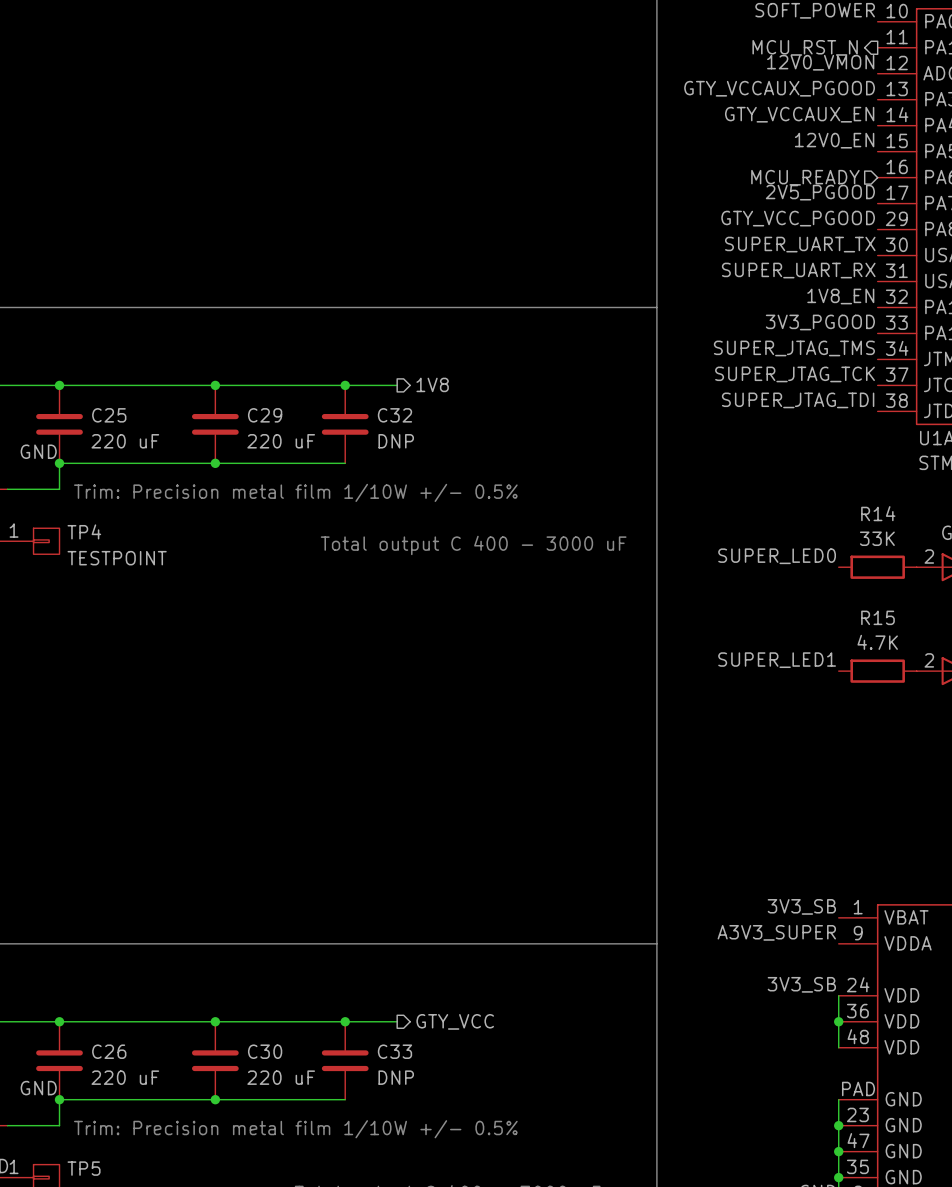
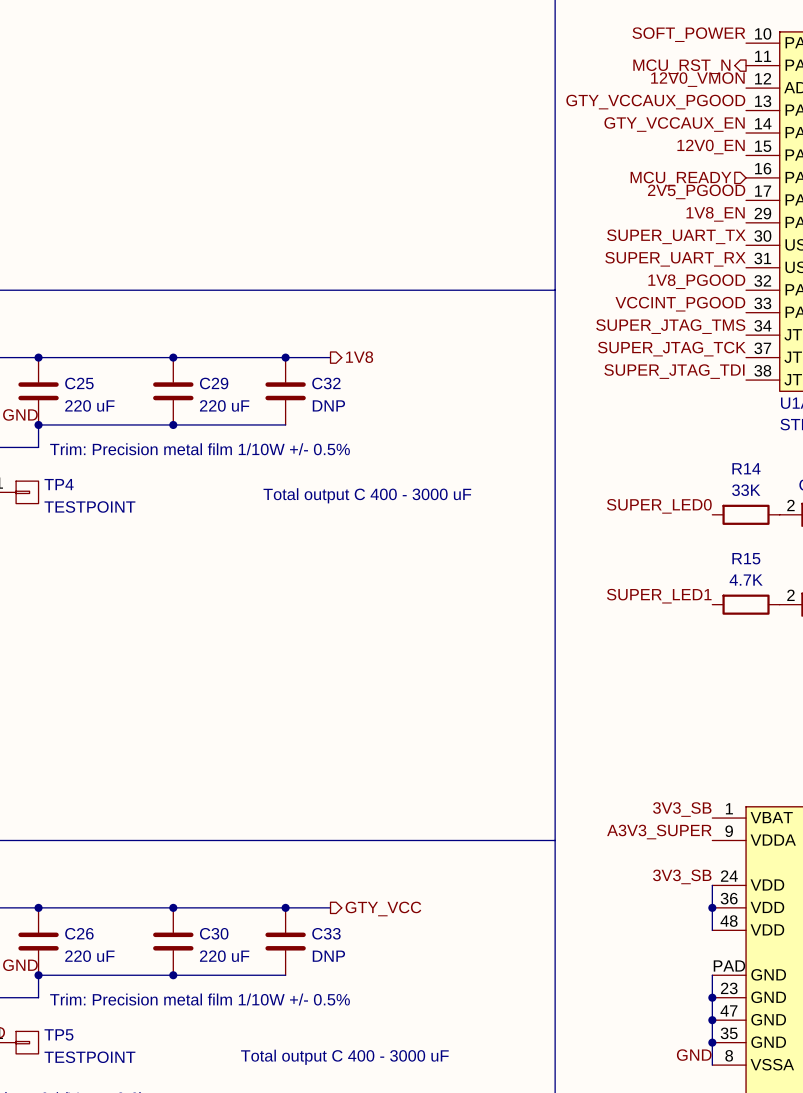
label: GTY_VCC_PGOOD (798, 218) -> 1V8_EN (715, 214)
label: 1V8_EN (840, 296) -> 1V8_PGOOD (696, 281)
label: 3V3_PGOOD (820, 322) -> VCCINT_PGOOD (680, 304)

